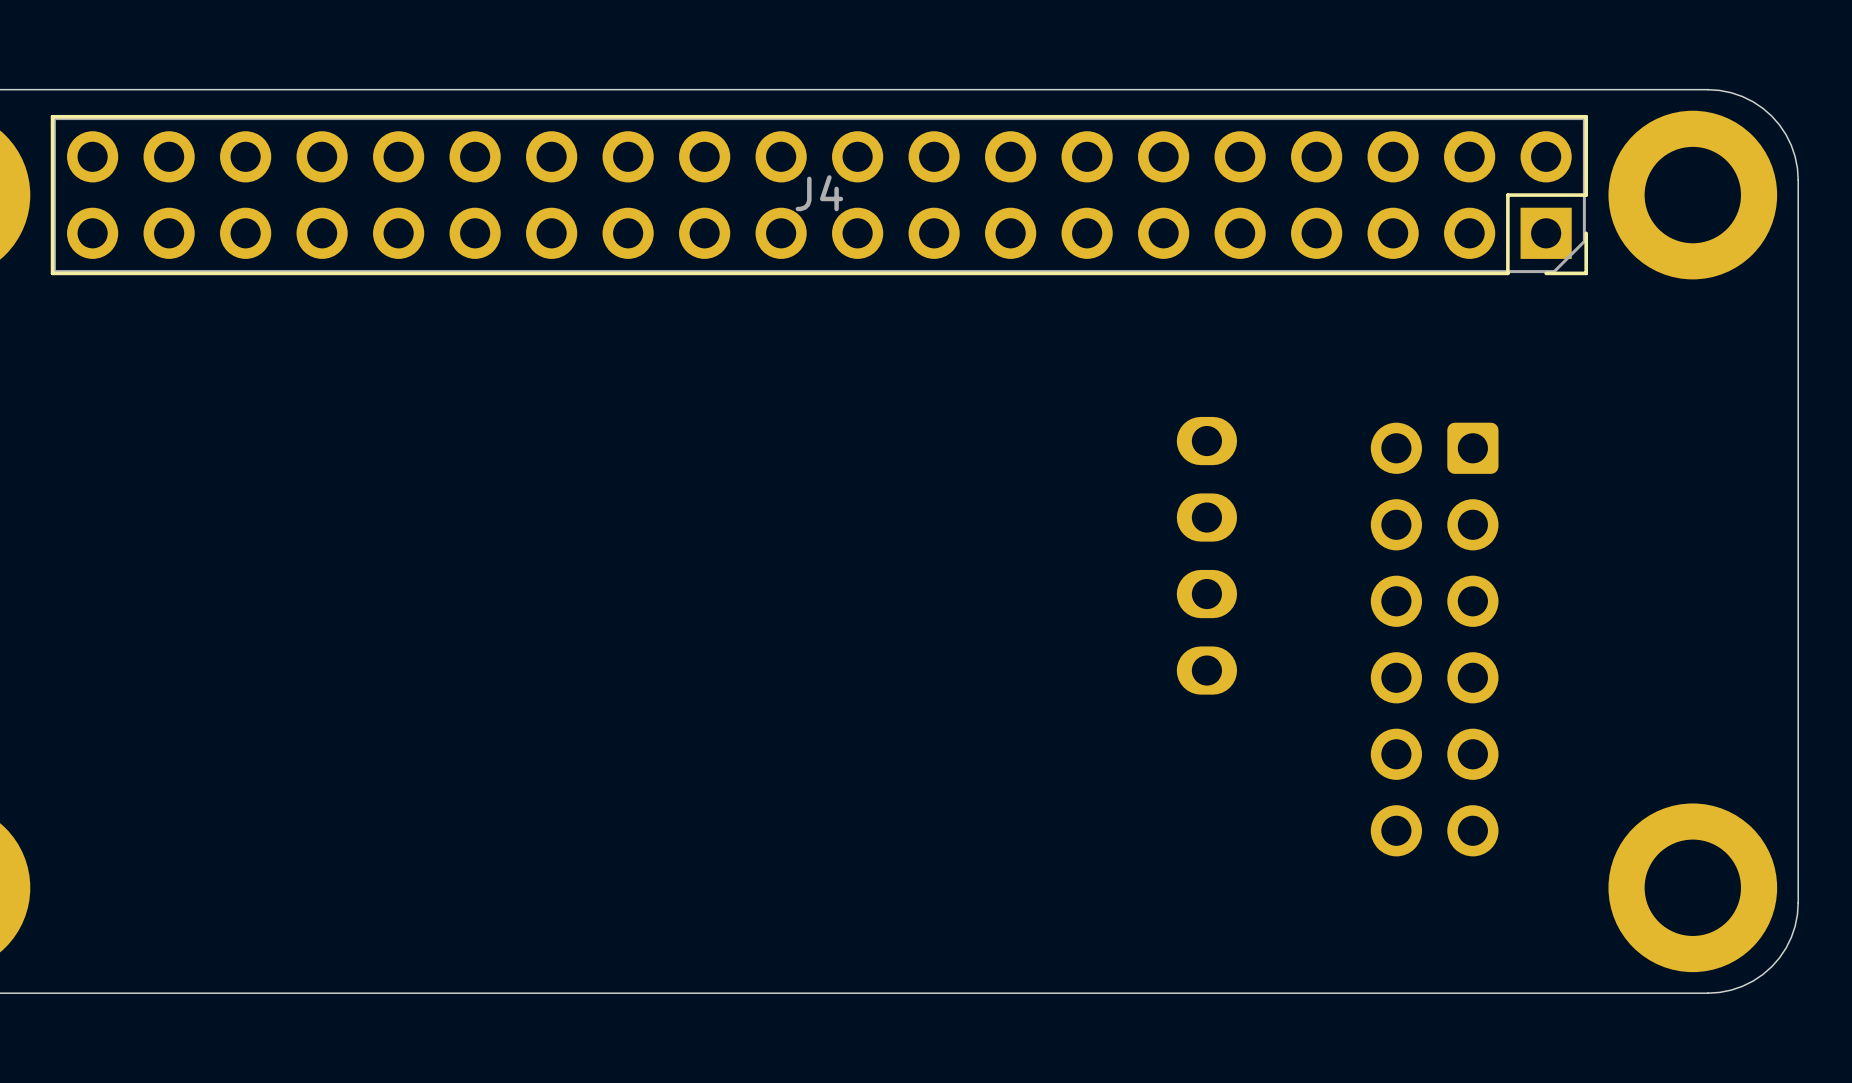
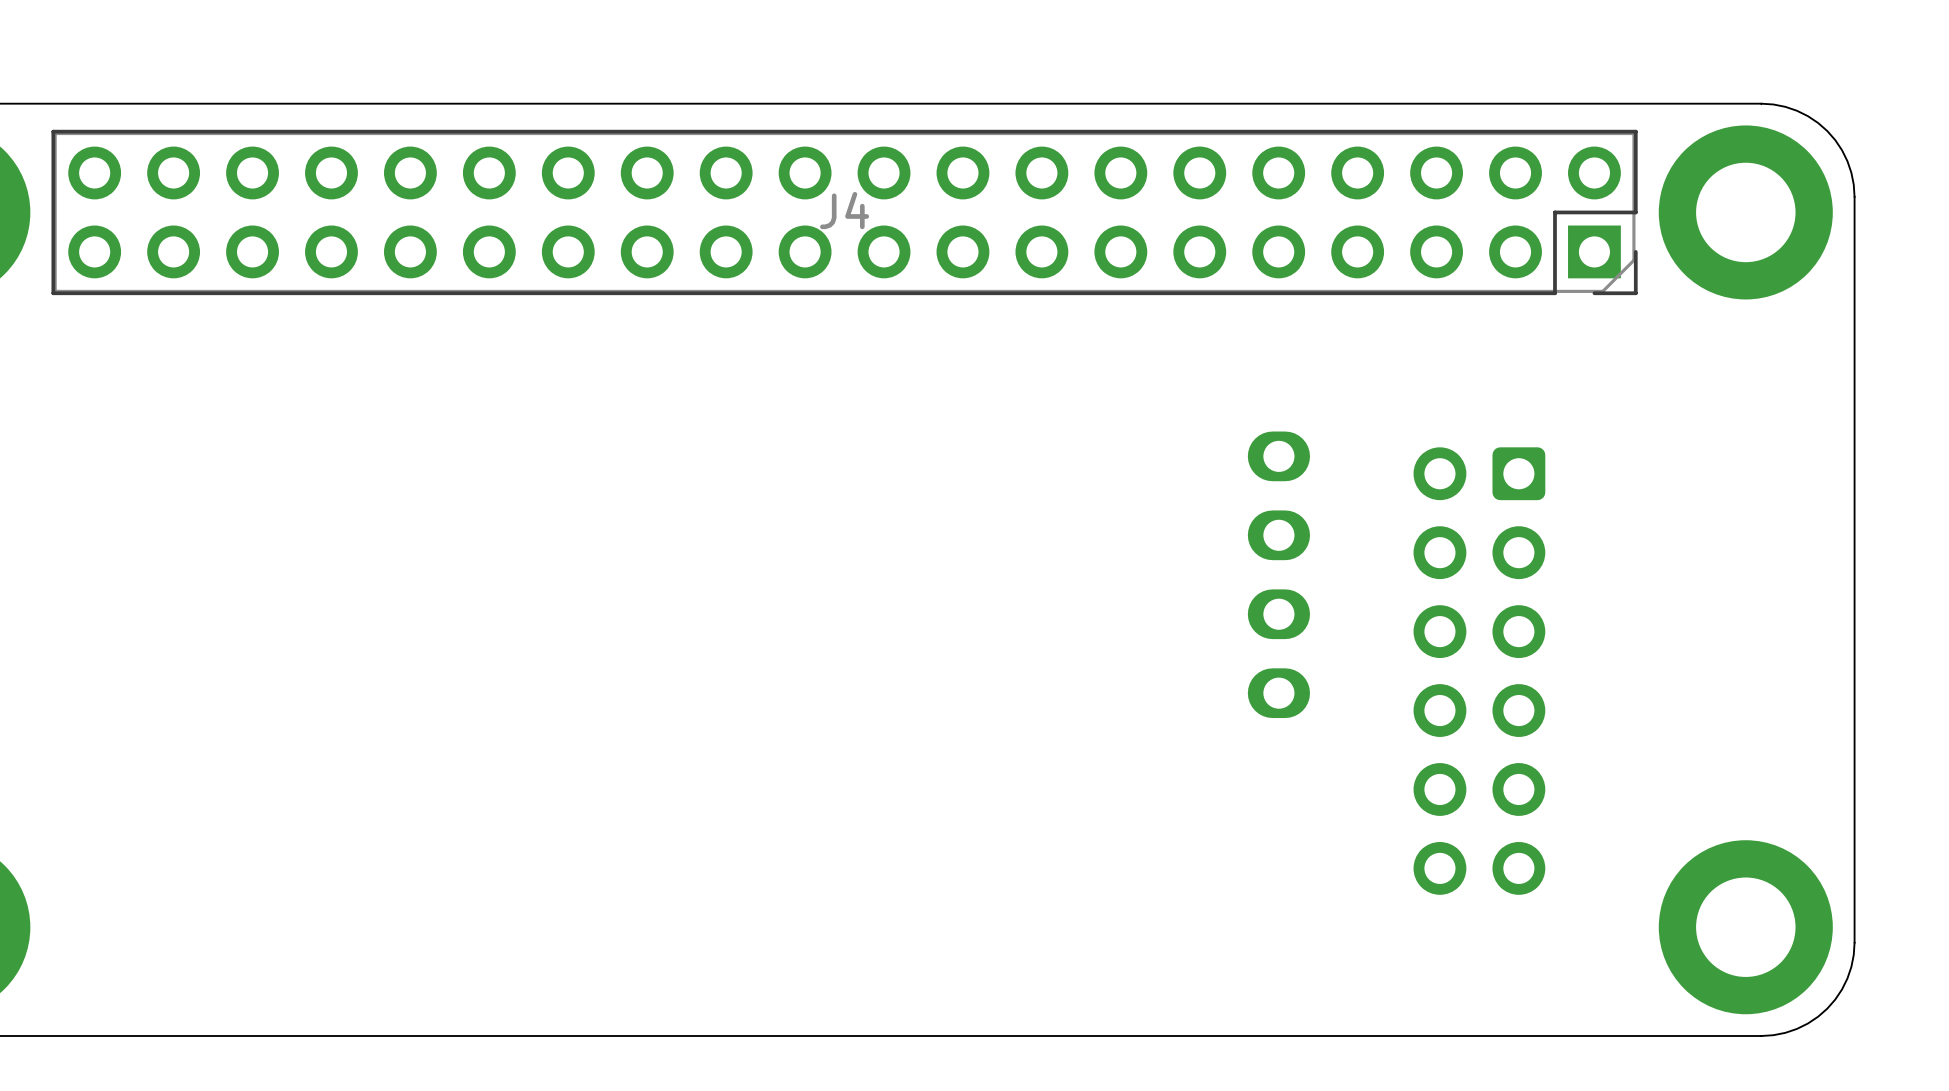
part position: (1206, 555) -> (1278, 574)

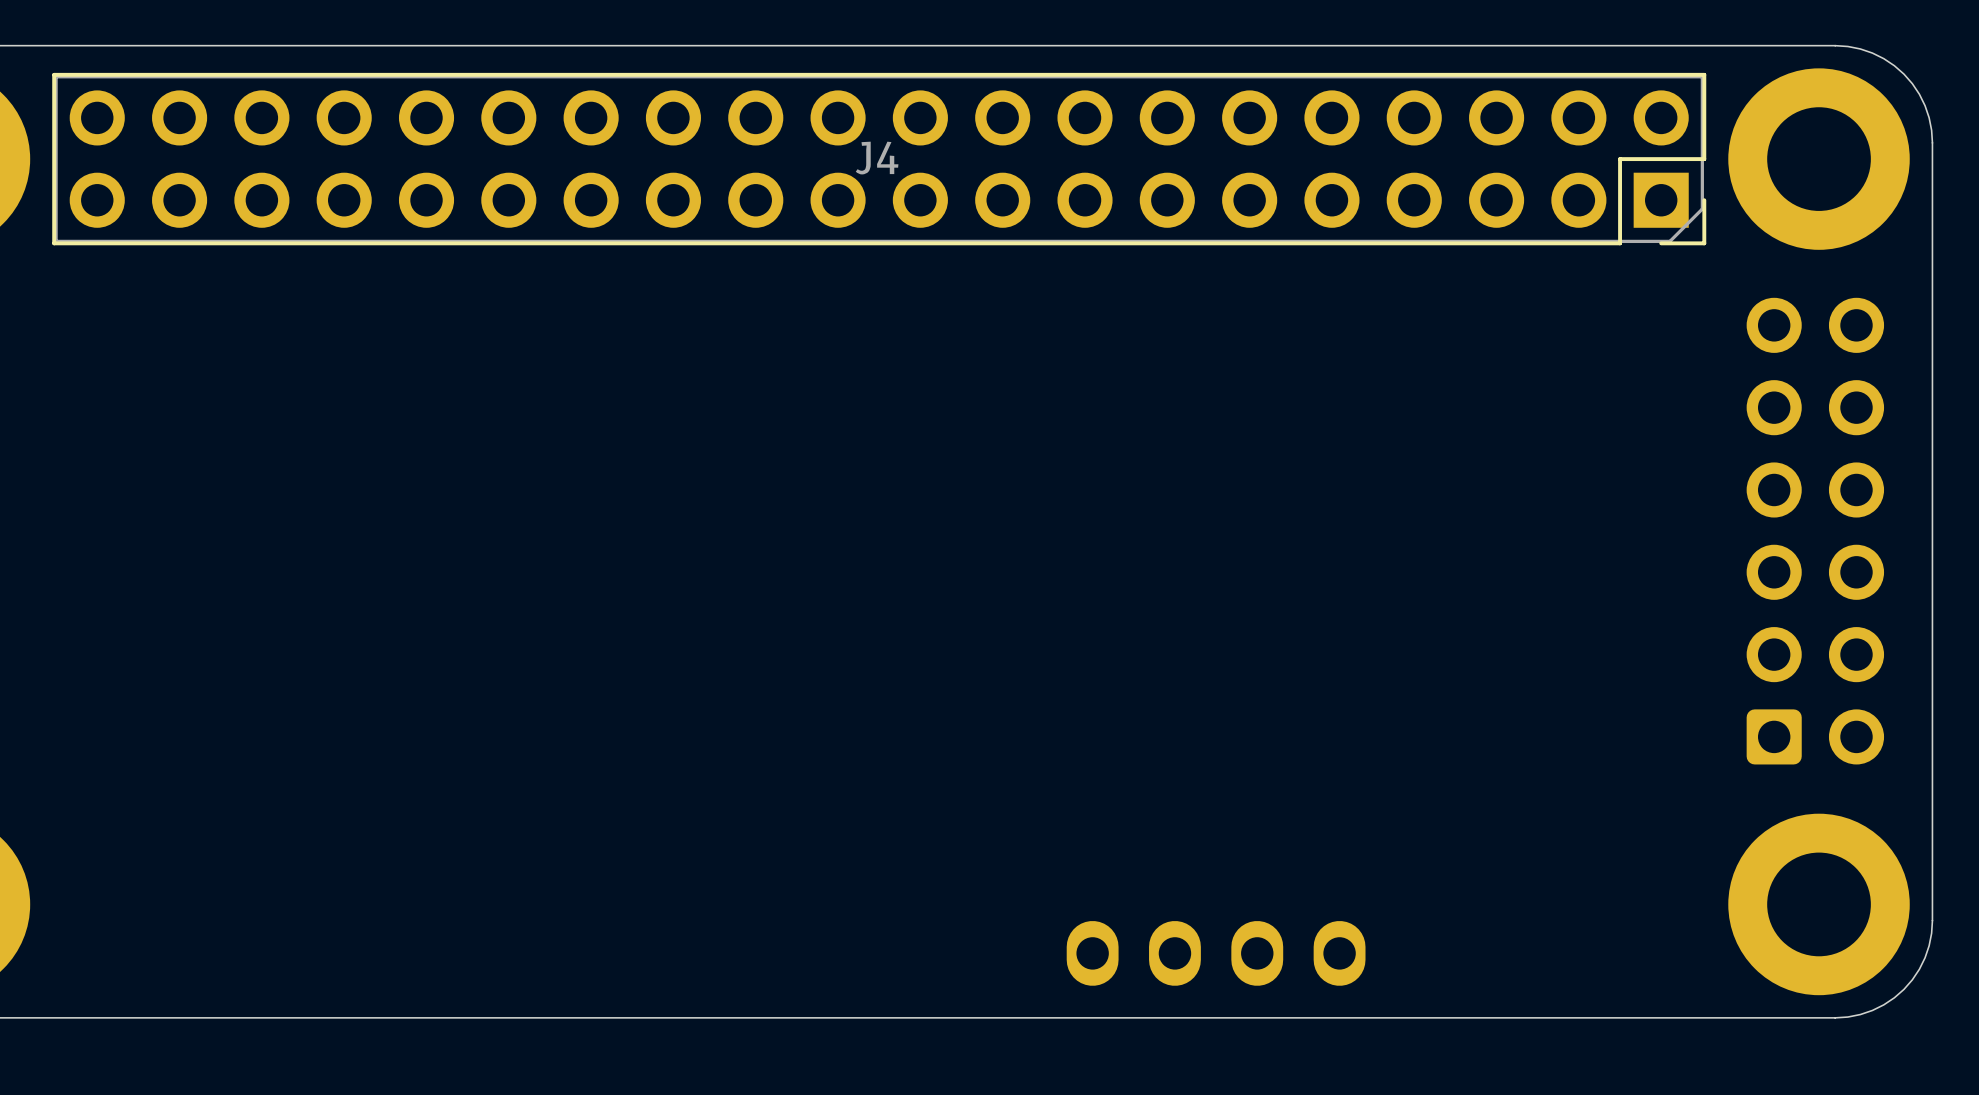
part rotation: 0° (1278, 574) -> 90° clockwise (1216, 953)
part position: (1278, 574) -> (1216, 953)
part rotation: 0° (1479, 671) -> 180° (1815, 531)
part position: (1479, 671) -> (1815, 531)

